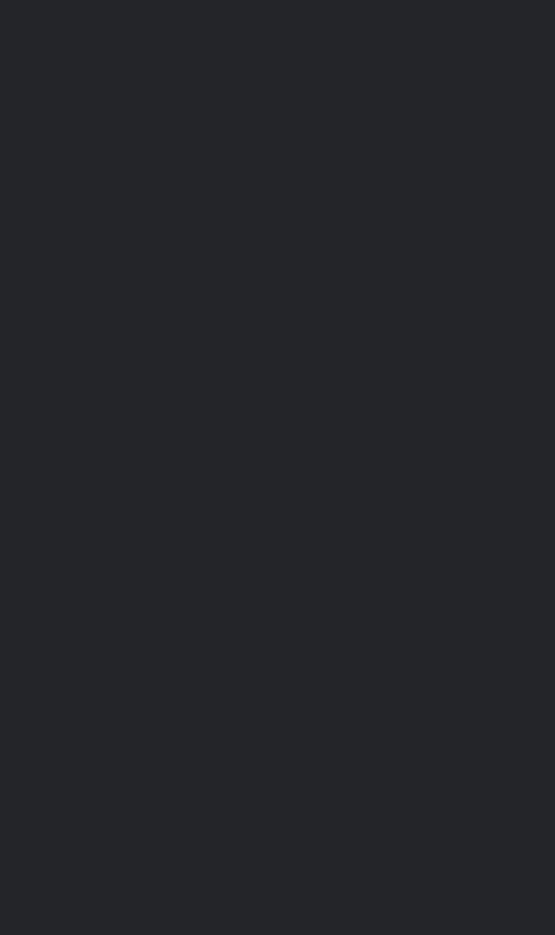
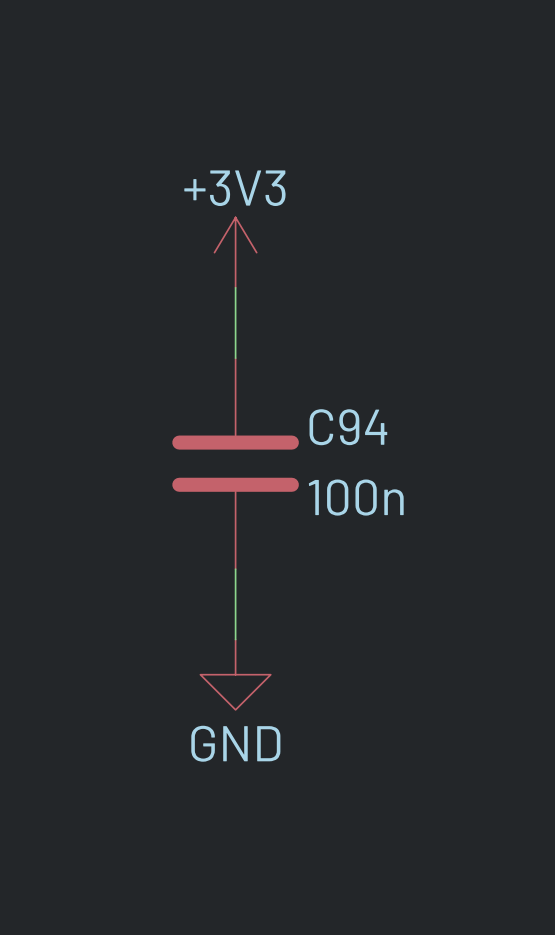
power symbol: none -> +3V3 (235, 252)
wire: none -> (235, 287) (235, 358)
C94: none -> 100n (235, 463)
wire: none -> (235, 569) (235, 639)
power symbol: none -> GND (235, 674)

